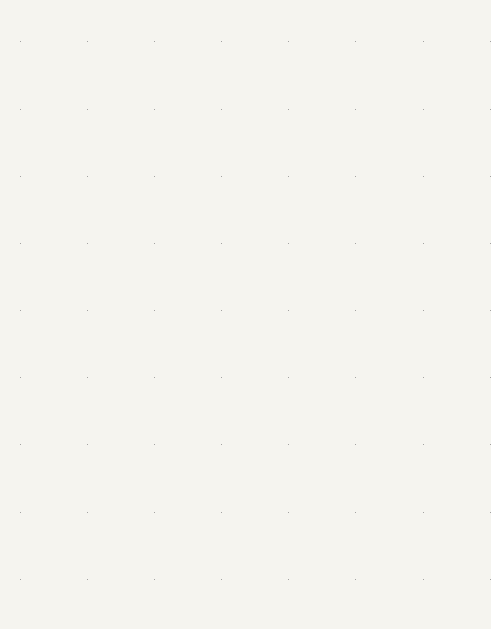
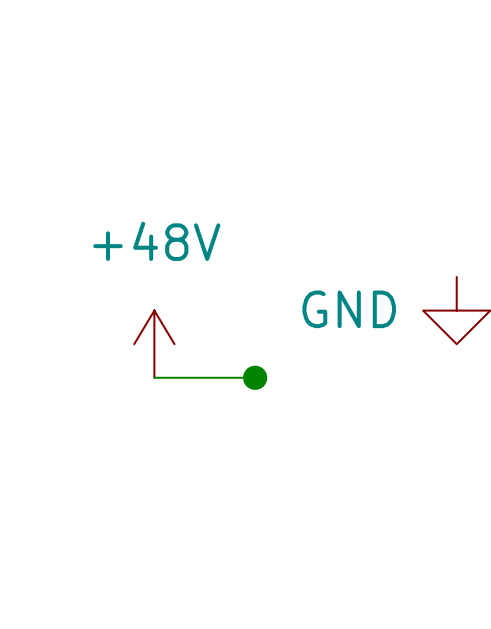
power symbol: none -> GND (456, 310)
power symbol: none -> +48V (154, 344)
wire: none -> (154, 377) (255, 377)
junction: none -> (255, 377)

